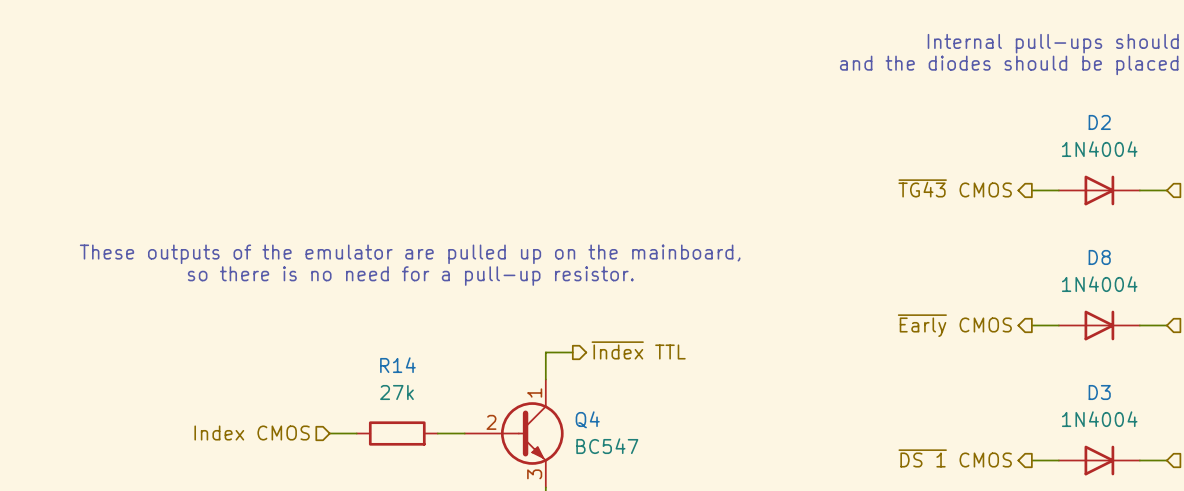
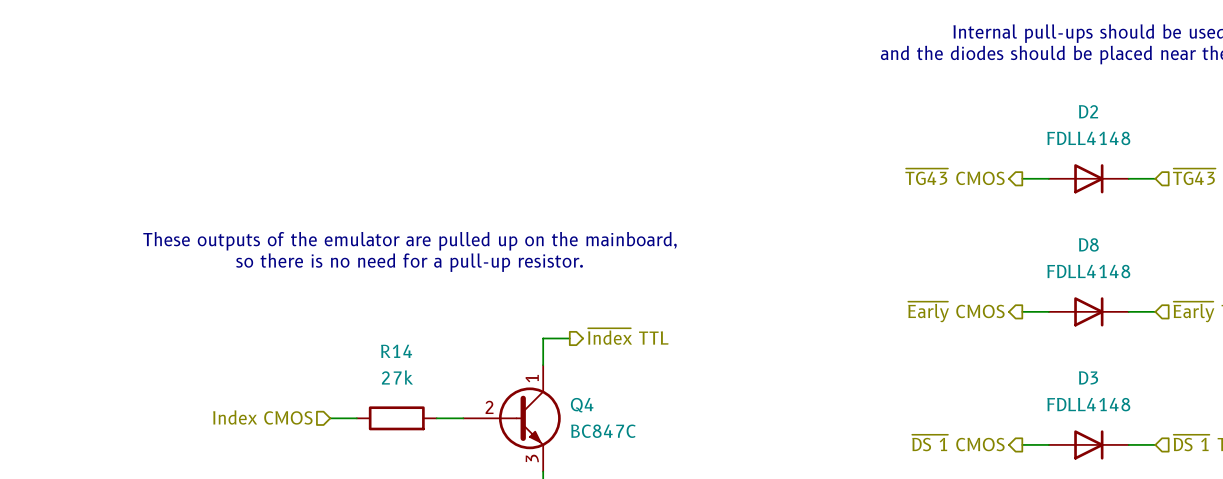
D2 value: 1N4004 (1099, 149) -> FDLL4148 (1088, 138)
D8 value: 1N4004 (1099, 284) -> FDLL4148 (1088, 271)
D3 value: 1N4004 (1099, 419) -> FDLL4148 (1088, 404)
Q4 value: BC547 (607, 446) -> BC847C (603, 431)

